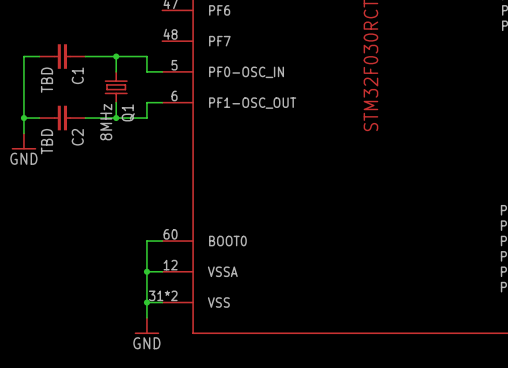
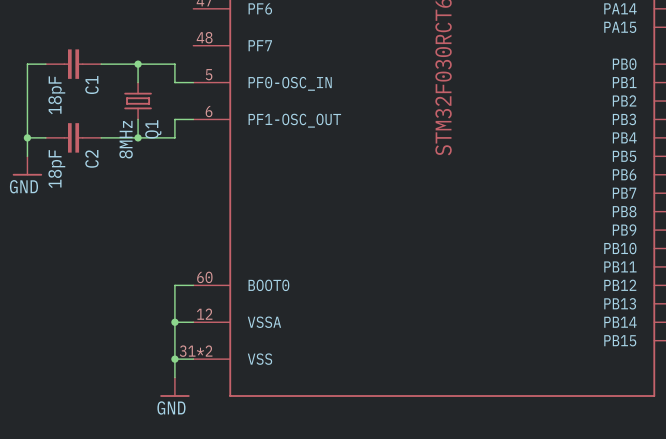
C1 value: TBD (47, 80) -> 18pF (56, 95)
C2 value: TBD (47, 141) -> 18pF (56, 169)

